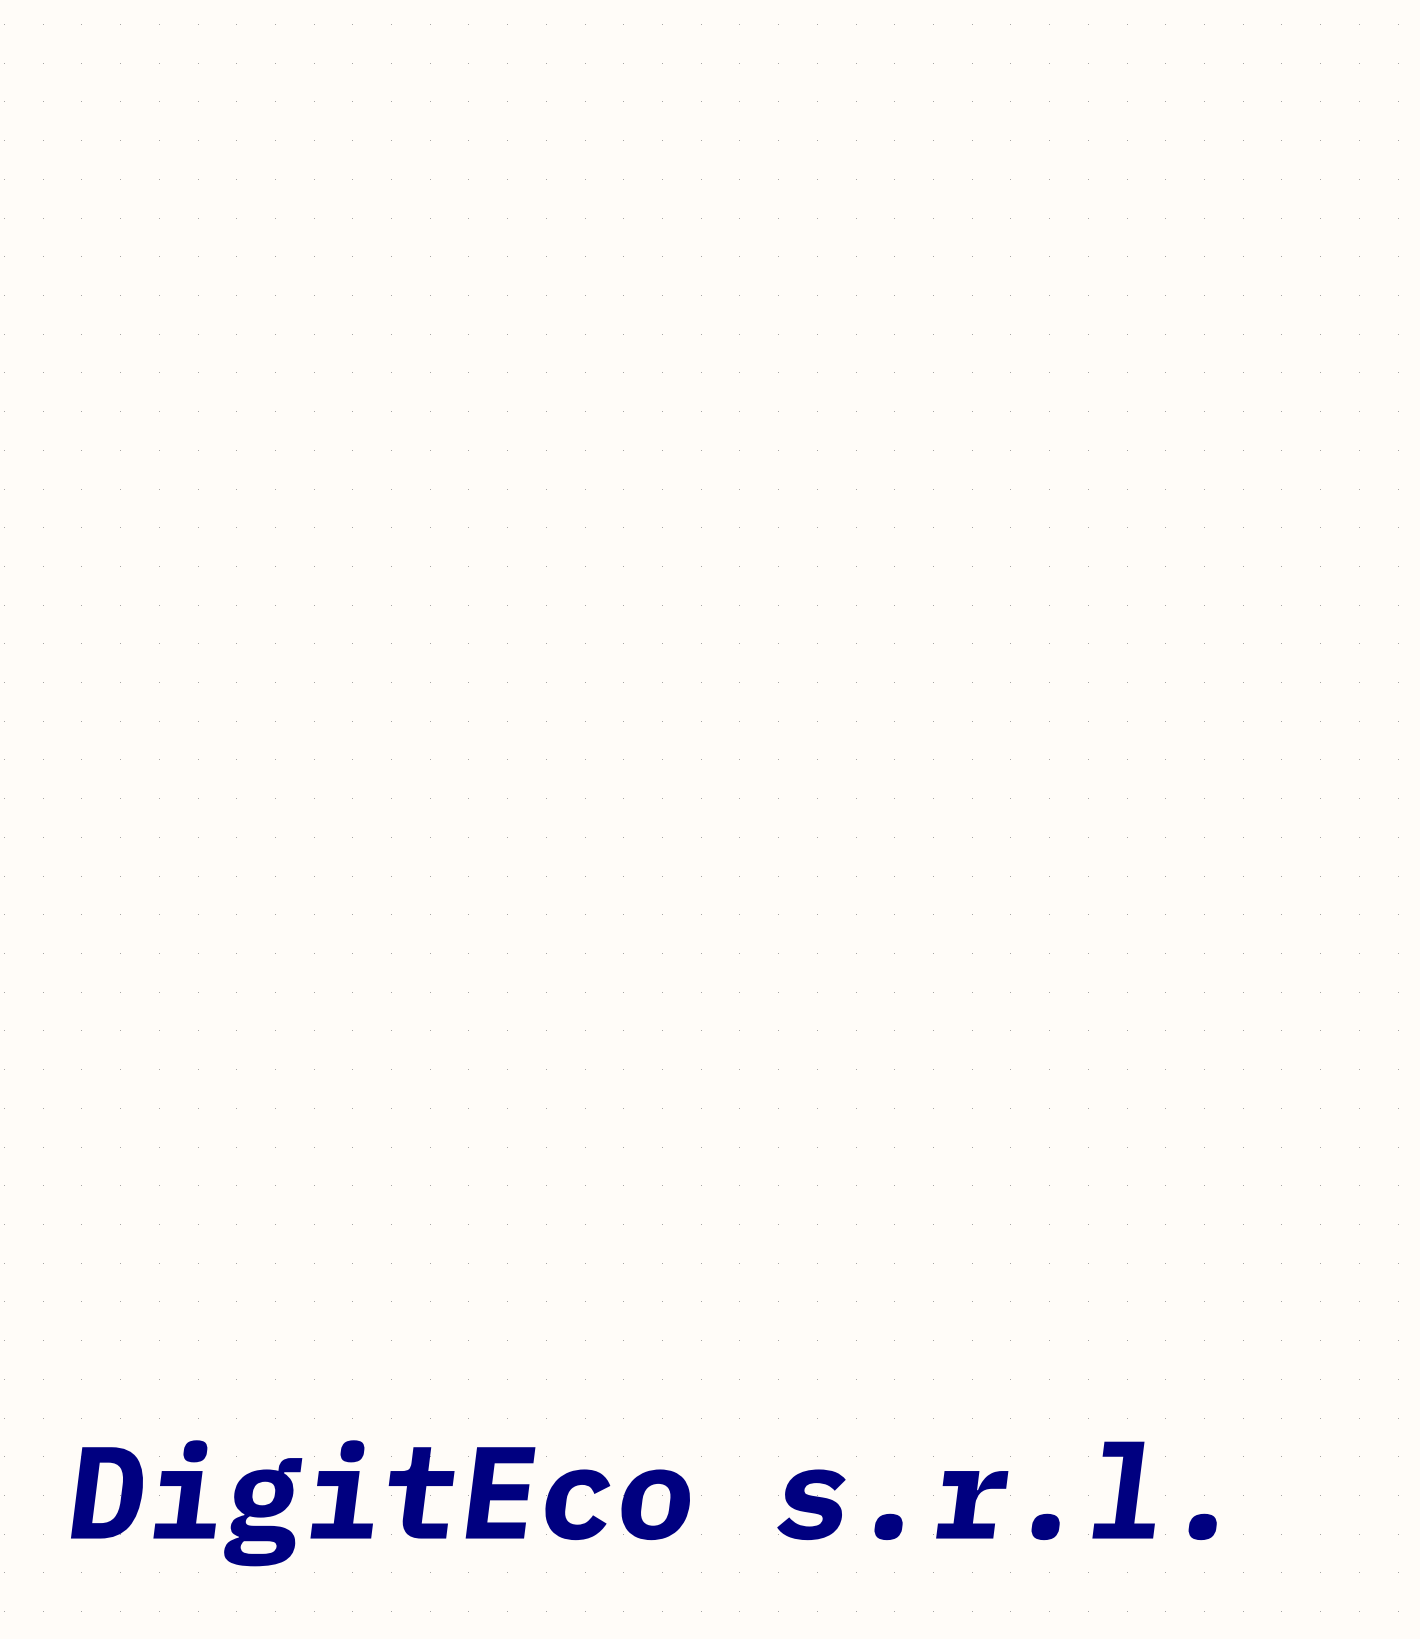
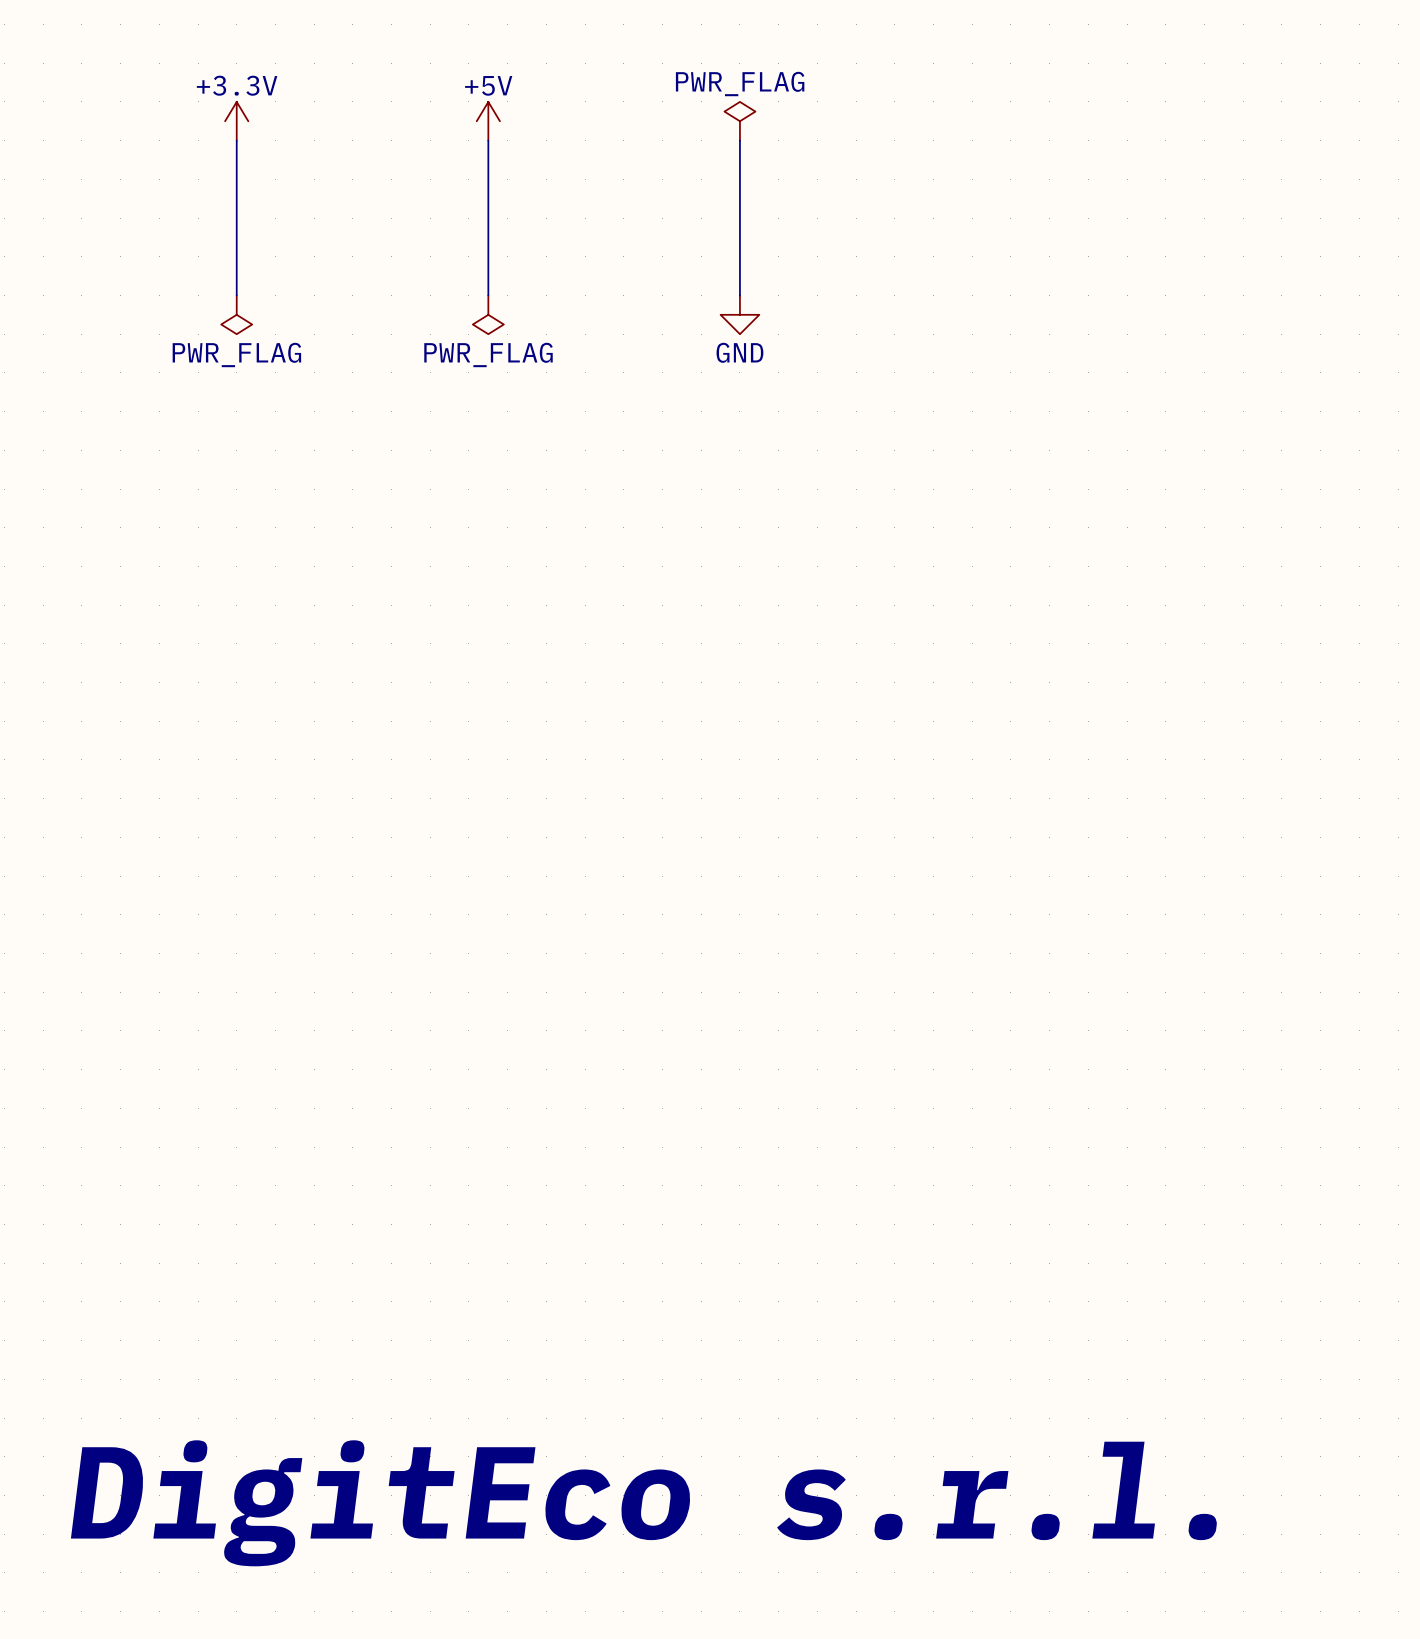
power symbol: none -> +3.3V (236, 121)
power symbol: none -> +5V (488, 121)
power symbol: none -> PWR_FLAG (739, 121)
wire: none -> (236, 140) (236, 295)
wire: none -> (488, 140) (488, 295)
wire: none -> (739, 140) (739, 295)
power symbol: none -> PWR_FLAG (236, 314)
power symbol: none -> PWR_FLAG (488, 314)
power symbol: none -> GND (739, 314)

